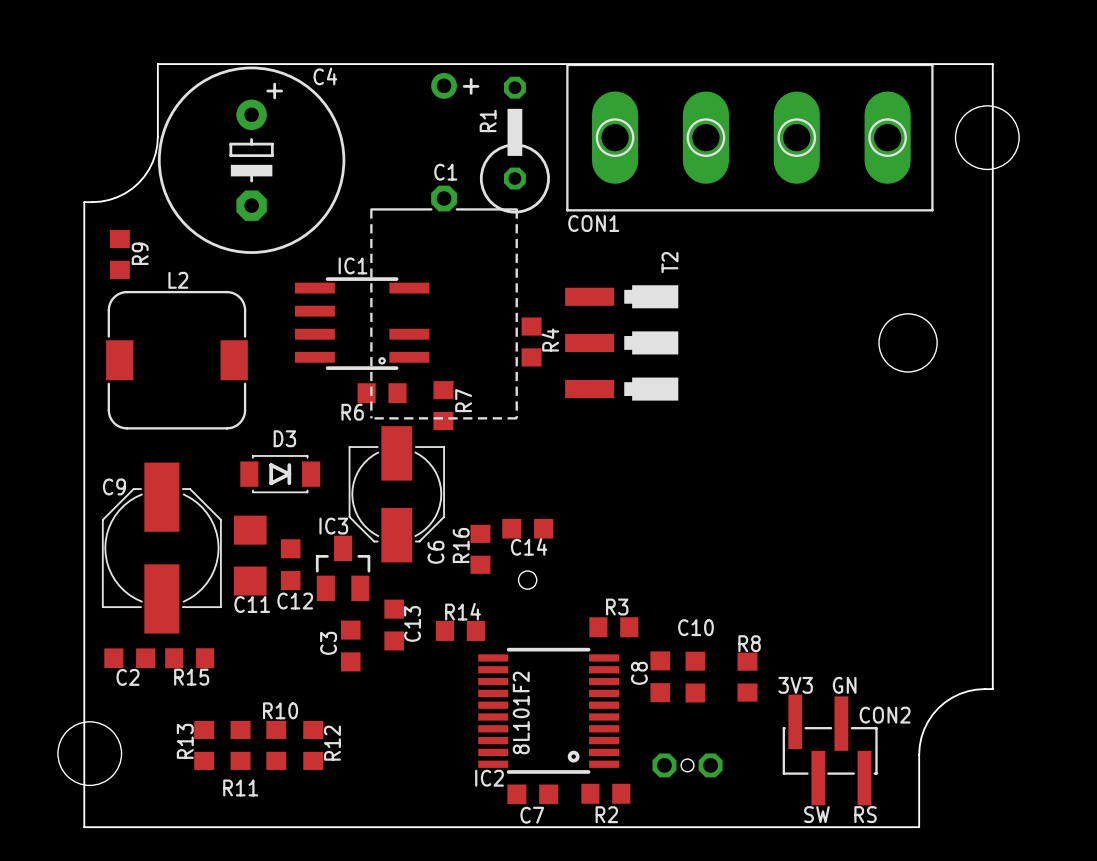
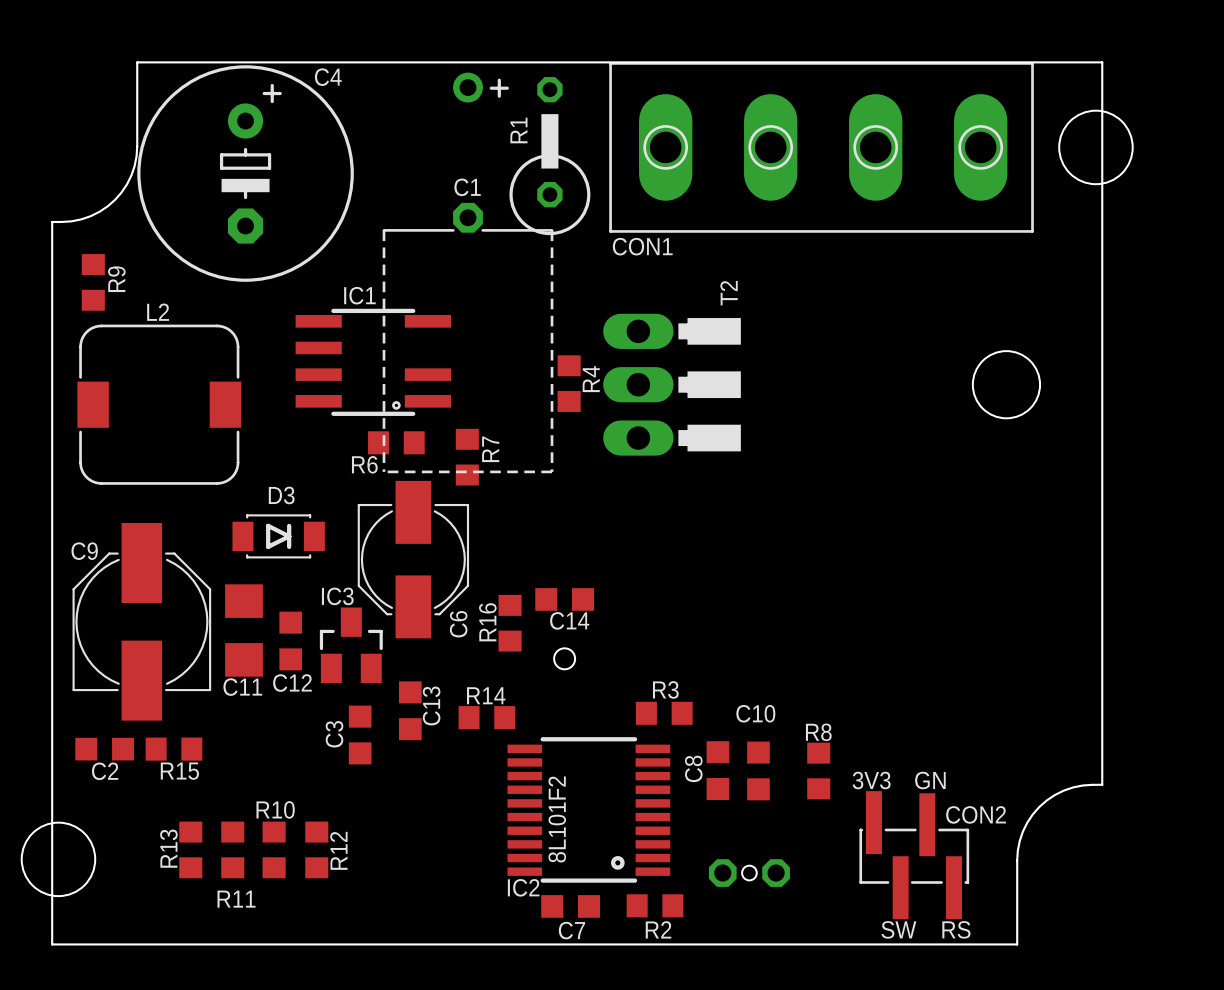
T2 footprint: [565, 285, 938, 401] -> [603, 313, 1041, 456]

